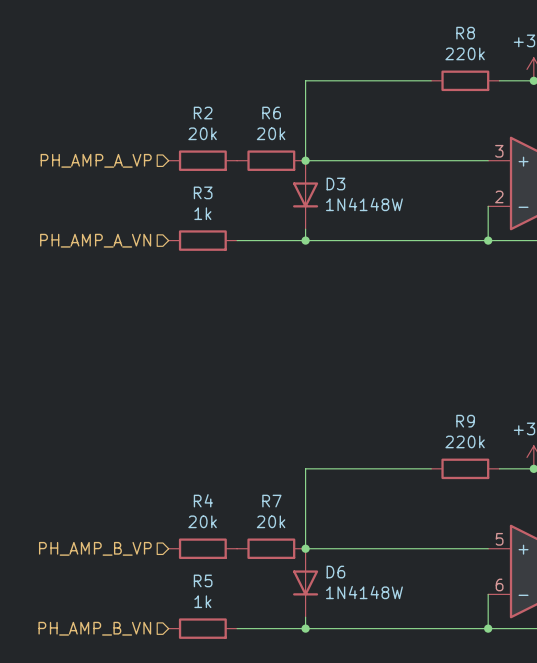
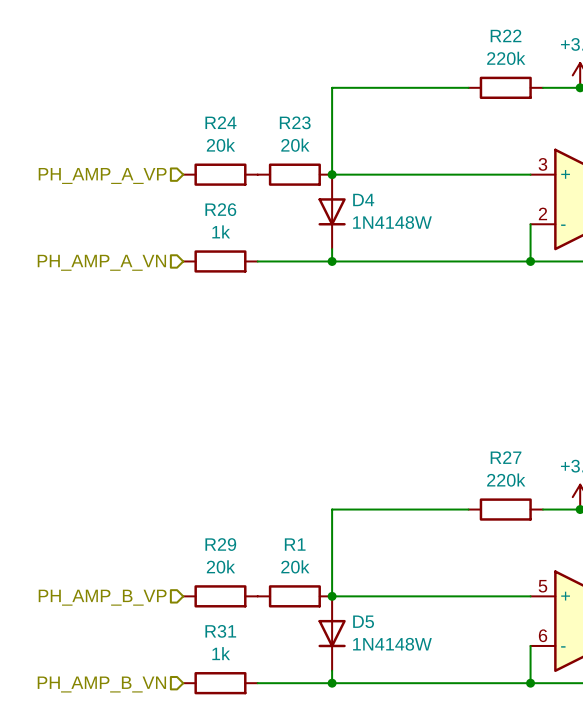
R8 name: R8 (465, 33) -> R22 (506, 35)
R2 name: R2 (203, 113) -> R24 (220, 122)
R6 name: R6 (271, 113) -> R23 (295, 122)
D3 name: D3 (335, 184) -> D4 (363, 199)
R3 name: R3 (203, 192) -> R26 (220, 209)
R9 name: R9 (465, 421) -> R27 (506, 457)
R4 name: R4 (203, 500) -> R29 (220, 544)
R7 name: R7 (271, 501) -> R1 (295, 544)
D6 name: D6 (335, 572) -> D5 (363, 621)
R5 name: R5 (203, 580) -> R31 (220, 631)

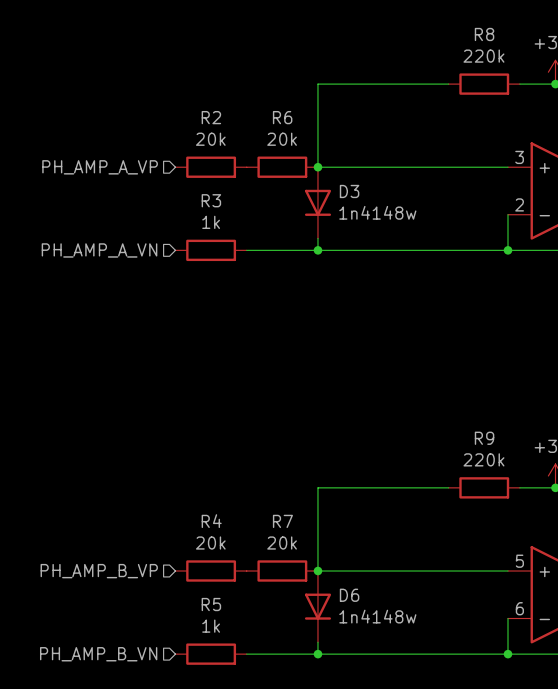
R22 name: R22 (506, 35) -> R8 (484, 34)
R24 name: R24 (220, 122) -> R2 (211, 117)
R23 name: R23 (295, 122) -> R6 (282, 117)
D4 name: D4 (363, 199) -> D3 (349, 191)
R26 name: R26 (220, 209) -> R3 (211, 200)
D4 value: 1N4148W (392, 222) -> 1n4148w (377, 212)
R27 name: R27 (506, 457) -> R9 (484, 438)
R29 name: R29 (220, 544) -> R4 (211, 521)
R1 name: R1 (295, 544) -> R7 (282, 521)
D5 name: D5 (363, 621) -> D6 (349, 595)
R31 name: R31 (220, 631) -> R5 (211, 604)
D5 value: 1N4148W (392, 644) -> 1n4148w (377, 616)

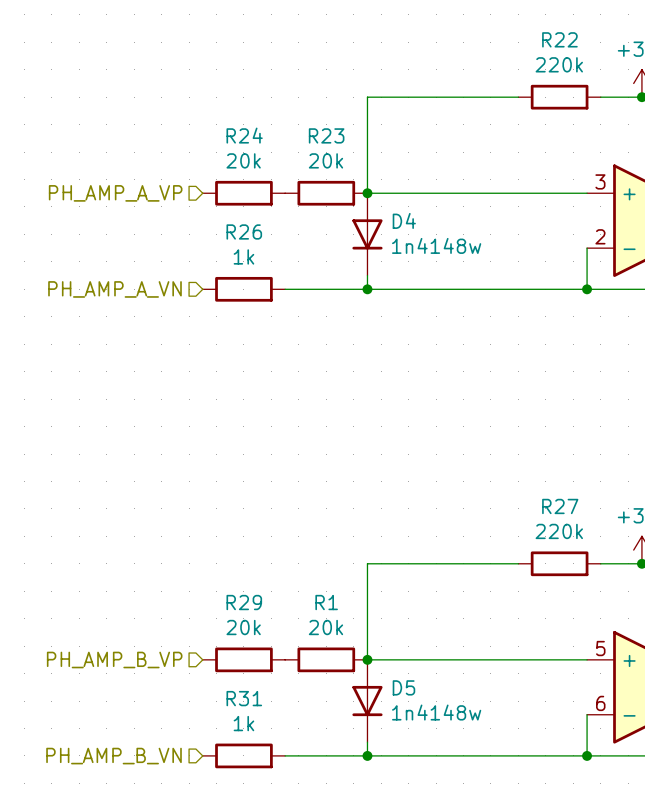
R8 name: R8 (484, 34) -> R22 (559, 39)
R2 name: R2 (211, 117) -> R24 (244, 135)
R6 name: R6 (282, 117) -> R23 (326, 135)
D3 name: D3 (349, 191) -> D4 (404, 220)
R3 name: R3 (211, 200) -> R26 (244, 231)
R9 name: R9 (484, 438) -> R27 (560, 506)
R4 name: R4 (211, 521) -> R29 (244, 602)
R7 name: R7 (282, 521) -> R1 (326, 602)
D6 name: D6 (349, 595) -> D5 (403, 687)
R5 name: R5 (211, 604) -> R31 (244, 698)

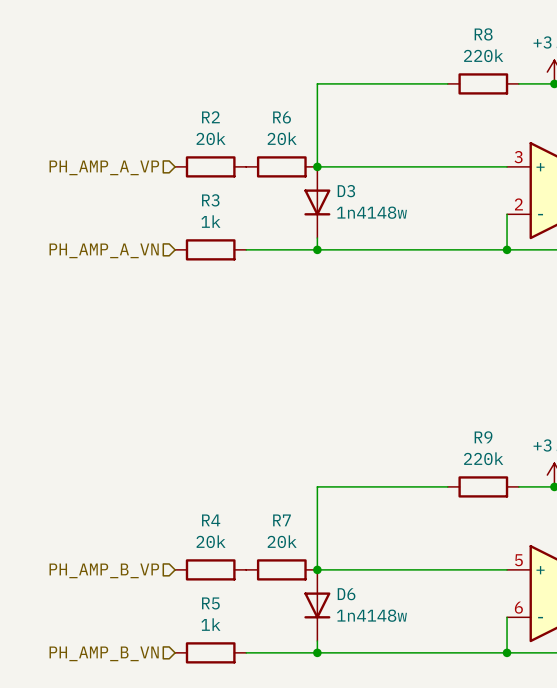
R22 name: R22 (559, 39) -> R8 (483, 34)
R24 name: R24 (244, 135) -> R2 (210, 117)
R23 name: R23 (326, 135) -> R6 (282, 117)
D4 name: D4 (404, 220) -> D3 (346, 191)
R26 name: R26 (244, 231) -> R3 (210, 200)
R27 name: R27 (560, 506) -> R9 (483, 437)
R29 name: R29 (244, 602) -> R4 (211, 520)
R1 name: R1 (326, 602) -> R7 (281, 520)
D5 name: D5 (403, 687) -> D6 (346, 594)
R31 name: R31 (244, 698) -> R5 (210, 603)

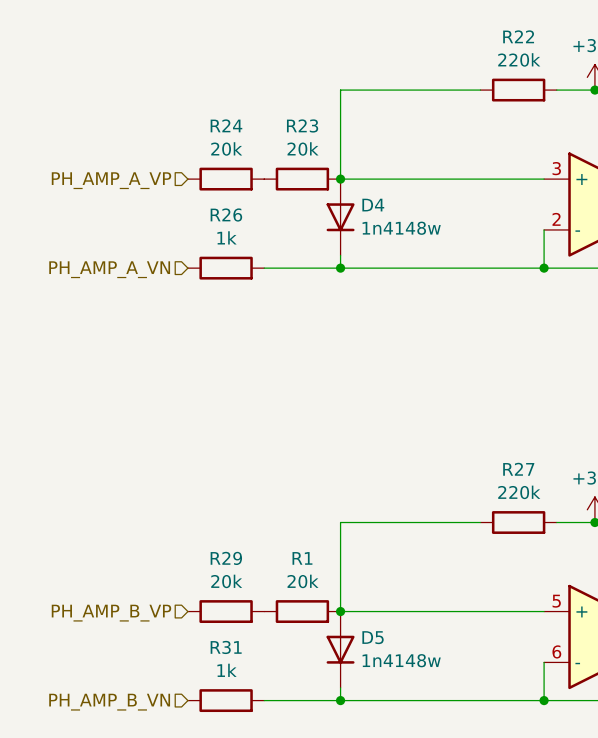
R8 name: R8 (483, 34) -> R22 (518, 36)
R2 name: R2 (210, 117) -> R24 (226, 125)
R6 name: R6 (282, 117) -> R23 (302, 125)
D3 name: D3 (346, 191) -> D4 (373, 205)
R3 name: R3 (210, 200) -> R26 (226, 215)
R9 name: R9 (483, 437) -> R27 (518, 469)
R4 name: R4 (211, 520) -> R29 (226, 558)
R7 name: R7 (281, 520) -> R1 (302, 558)
D6 name: D6 (346, 594) -> D5 (373, 637)
R5 name: R5 (210, 603) -> R31 (226, 647)

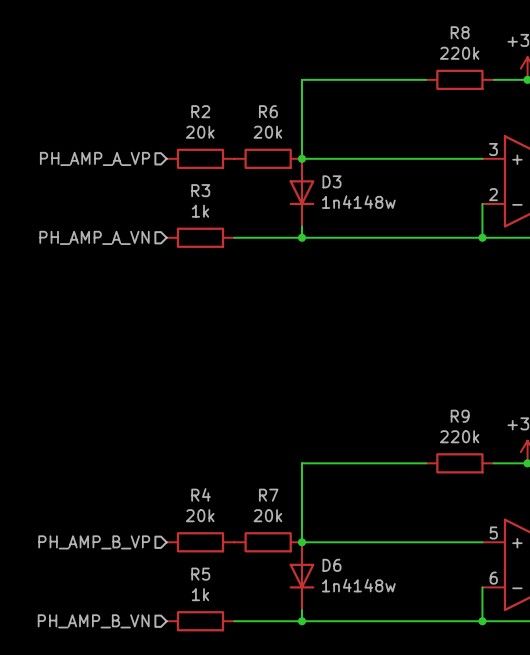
R22 name: R22 (518, 36) -> R8 (460, 32)
R24 name: R24 (226, 125) -> R2 (200, 111)
R23 name: R23 (302, 125) -> R6 (268, 111)
D4 name: D4 (373, 205) -> D3 (331, 181)
R26 name: R26 (226, 215) -> R3 (200, 190)
R27 name: R27 (518, 469) -> R9 (460, 416)
R29 name: R29 (226, 558) -> R4 (201, 494)
R1 name: R1 (302, 558) -> R7 (268, 495)
D5 name: D5 (373, 637) -> D6 (331, 565)
R31 name: R31 (226, 647) -> R5 (200, 574)

